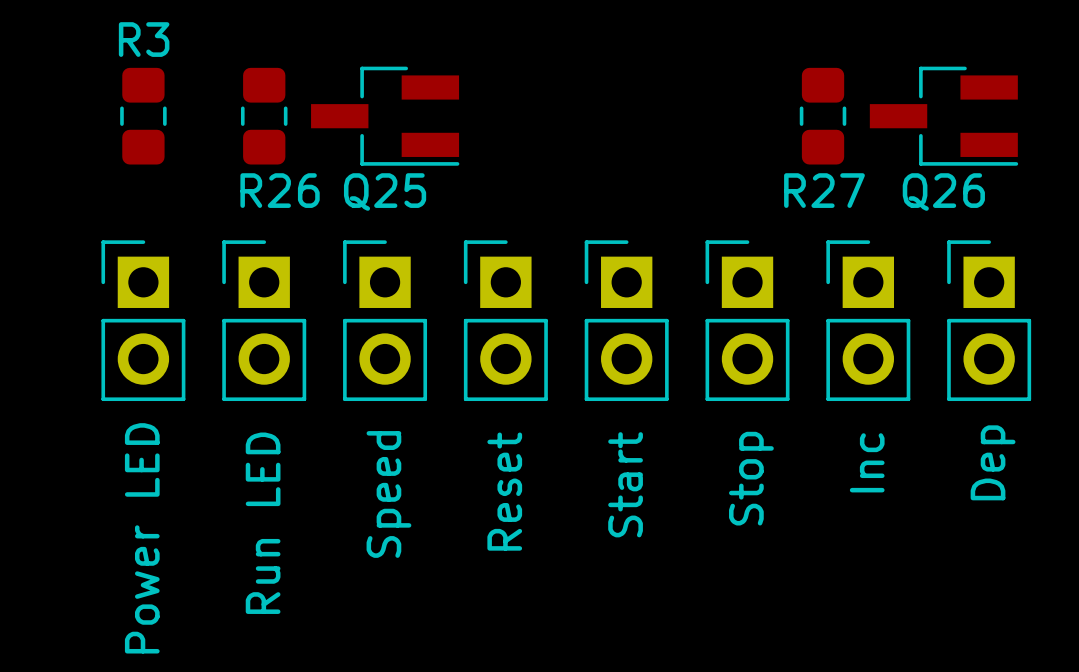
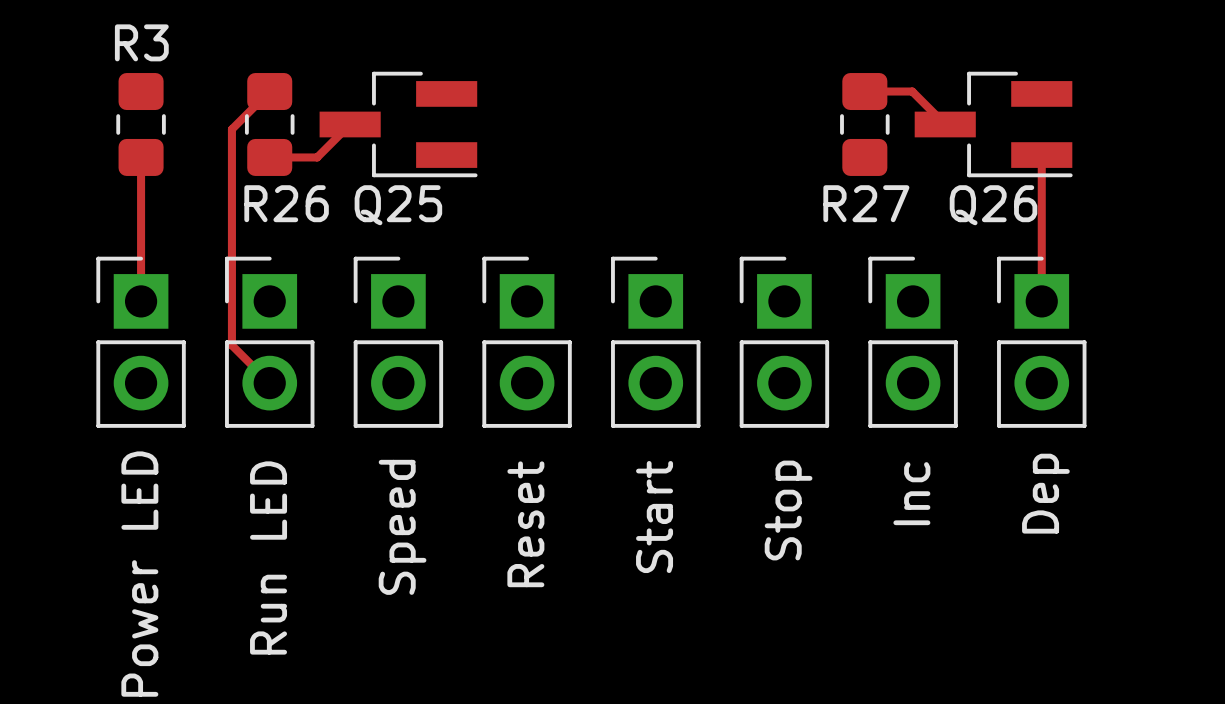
track: none -> (269, 91) (231, 129) (231, 345) (269, 383)
track: none -> (864, 91) (912, 91) (945, 124)
track: none -> (350, 124) (317, 157) (269, 157)
track: none -> (1041, 155) (1041, 301)
track: none -> (141, 157) (141, 301)

